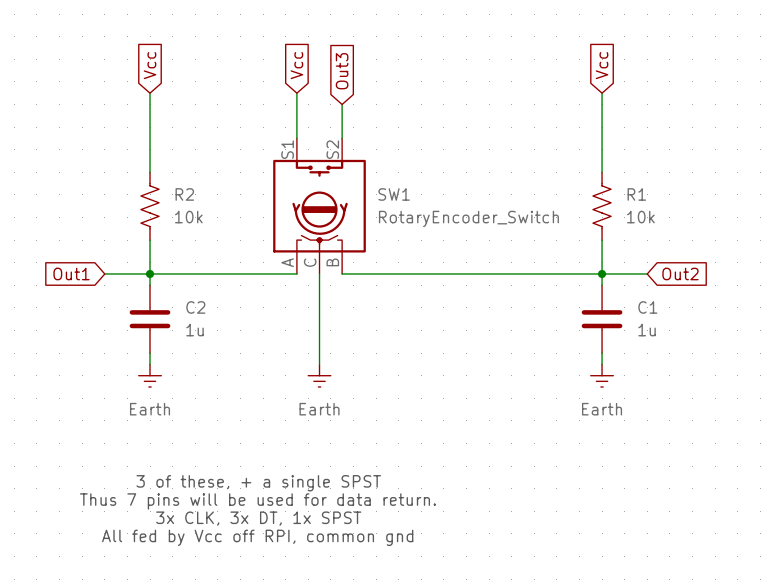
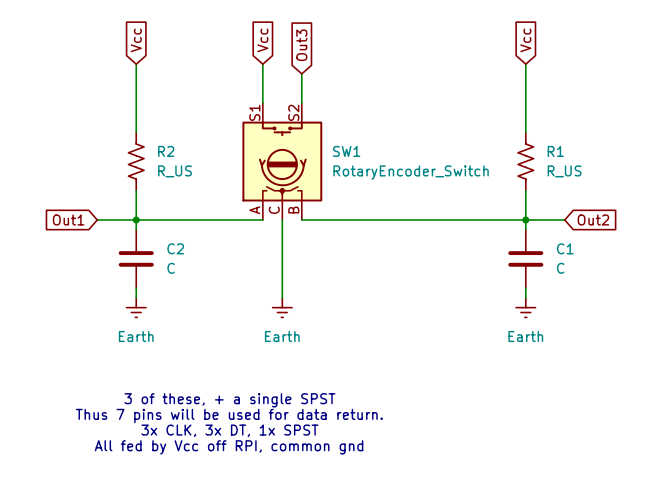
R2 value: 10k (188, 217) -> R_US (175, 171)
R1 value: 10k (640, 217) -> R_US (564, 171)
C2 value: 1u (195, 330) -> C (171, 268)
C1 value: 1u (647, 330) -> C (560, 268)

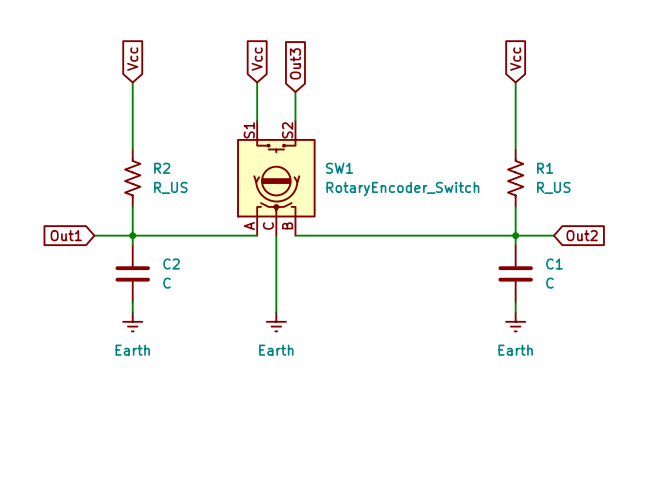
text: 3 of these, + a single SPST (229, 400) -> none
text: Thus 7 pins will be used for data return. (229, 416) -> none
text: 3x CLK, 3x DT, 1x SPST (229, 430) -> none
text: All fed by Vcc off RPI, common gnd (229, 447) -> none

